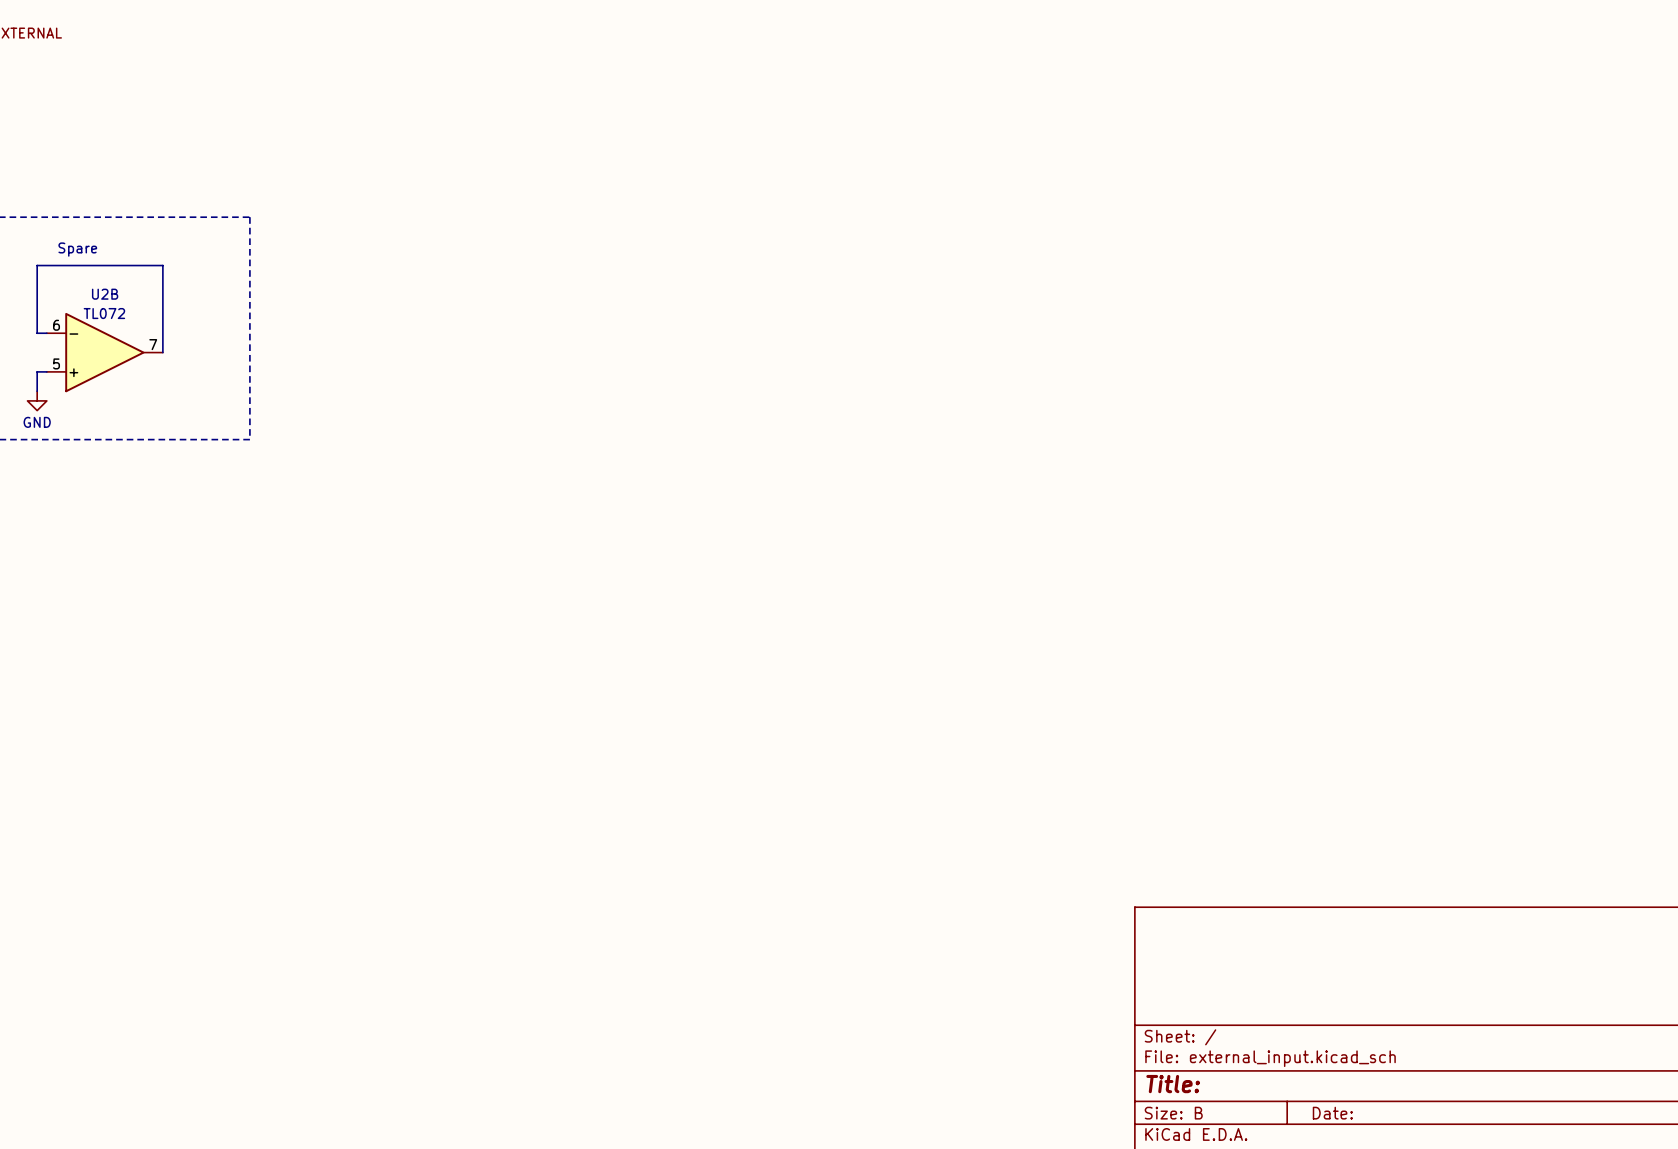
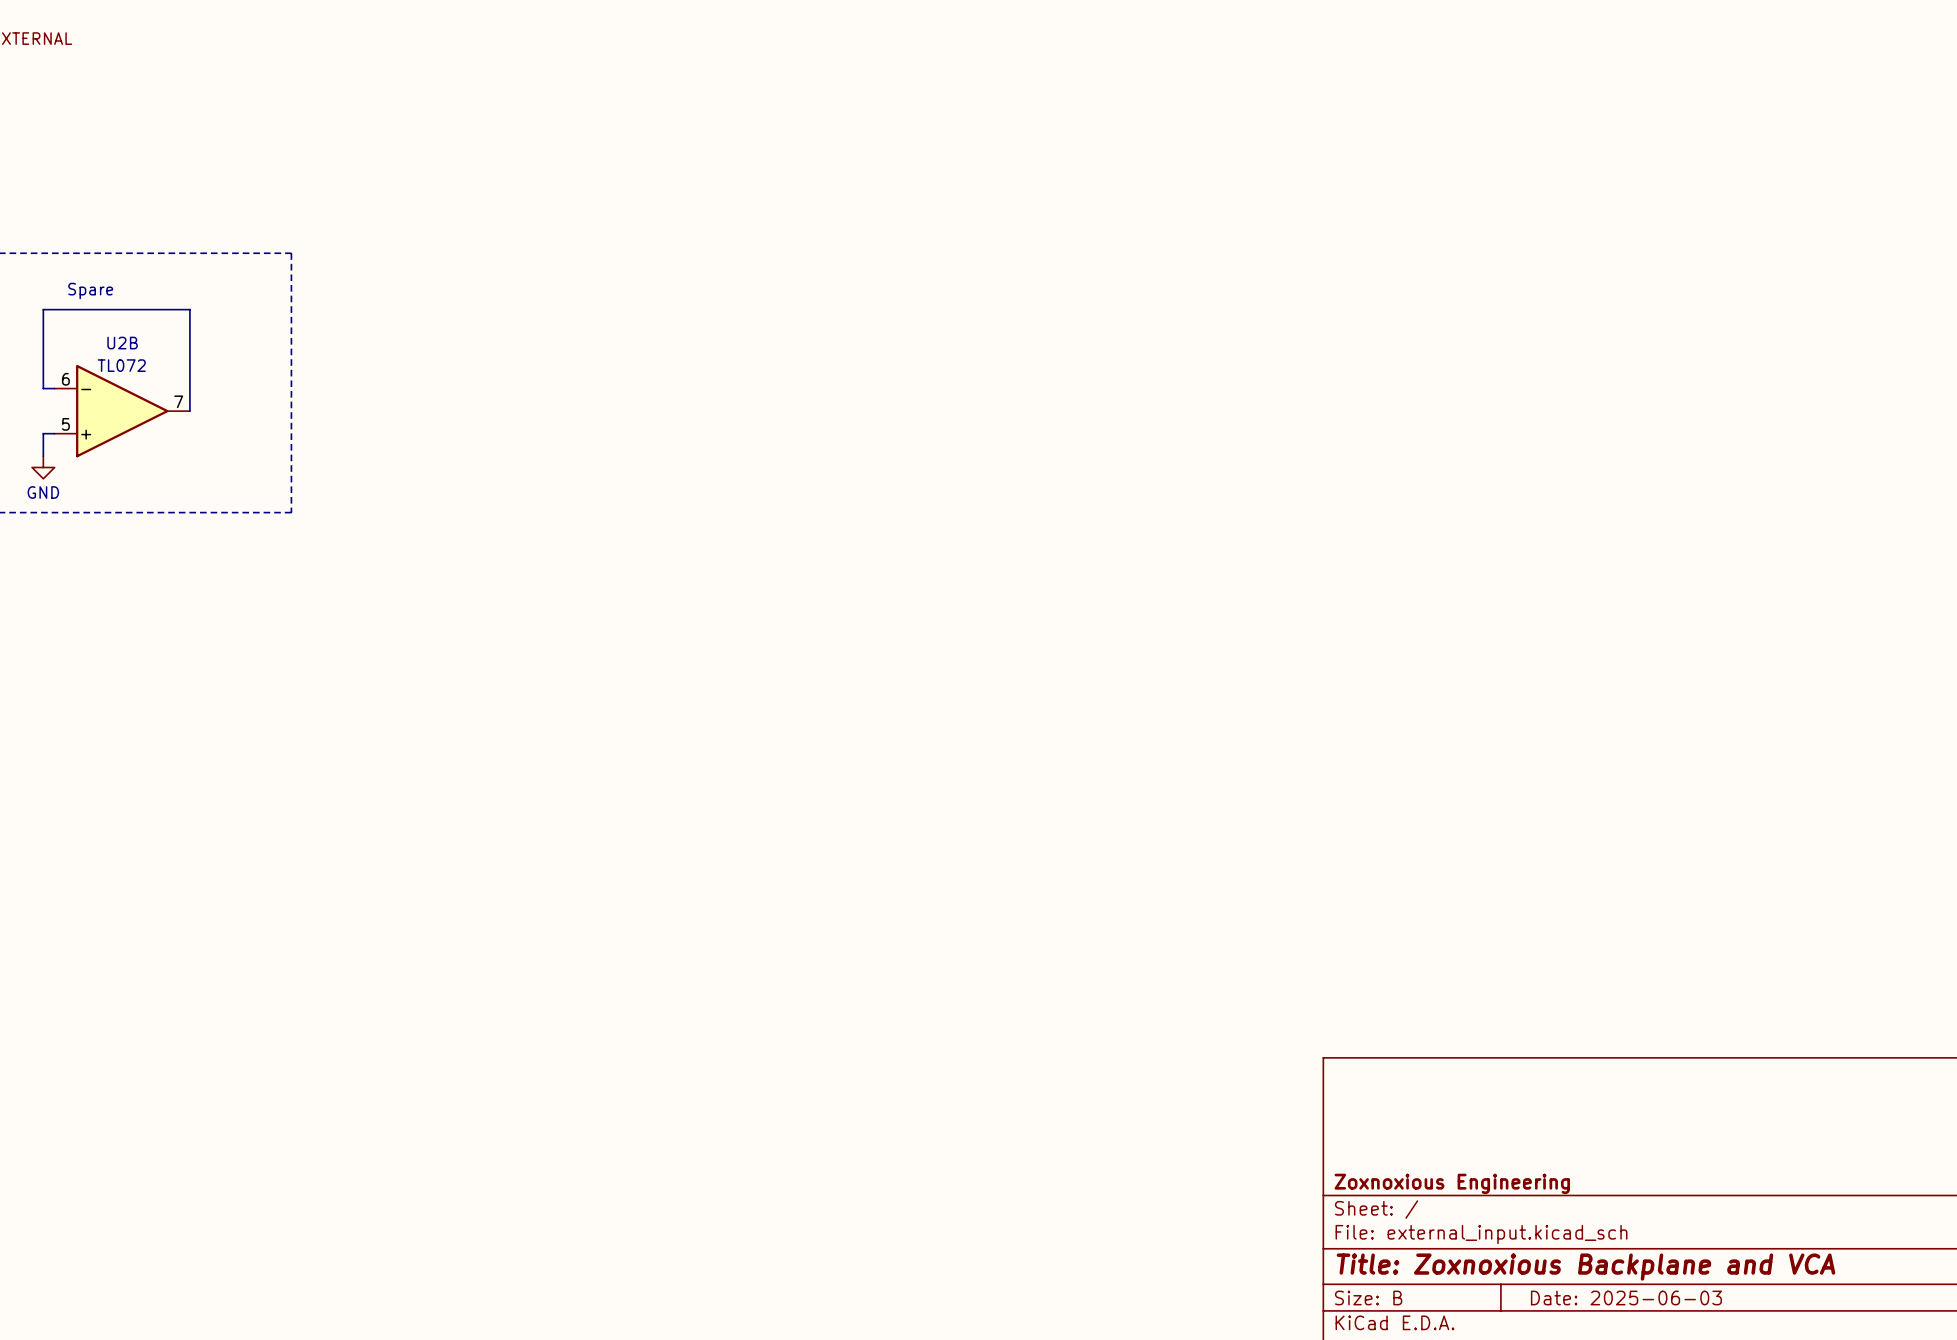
title block: none -> Zoxnoxious Engineering (1452, 1183)
title block: Title: (1173, 1084) -> Title: Zoxnoxious Backplane and VCA (1585, 1267)
title block: Date: (1332, 1113) -> Date: 2025-06-03 (1626, 1297)

